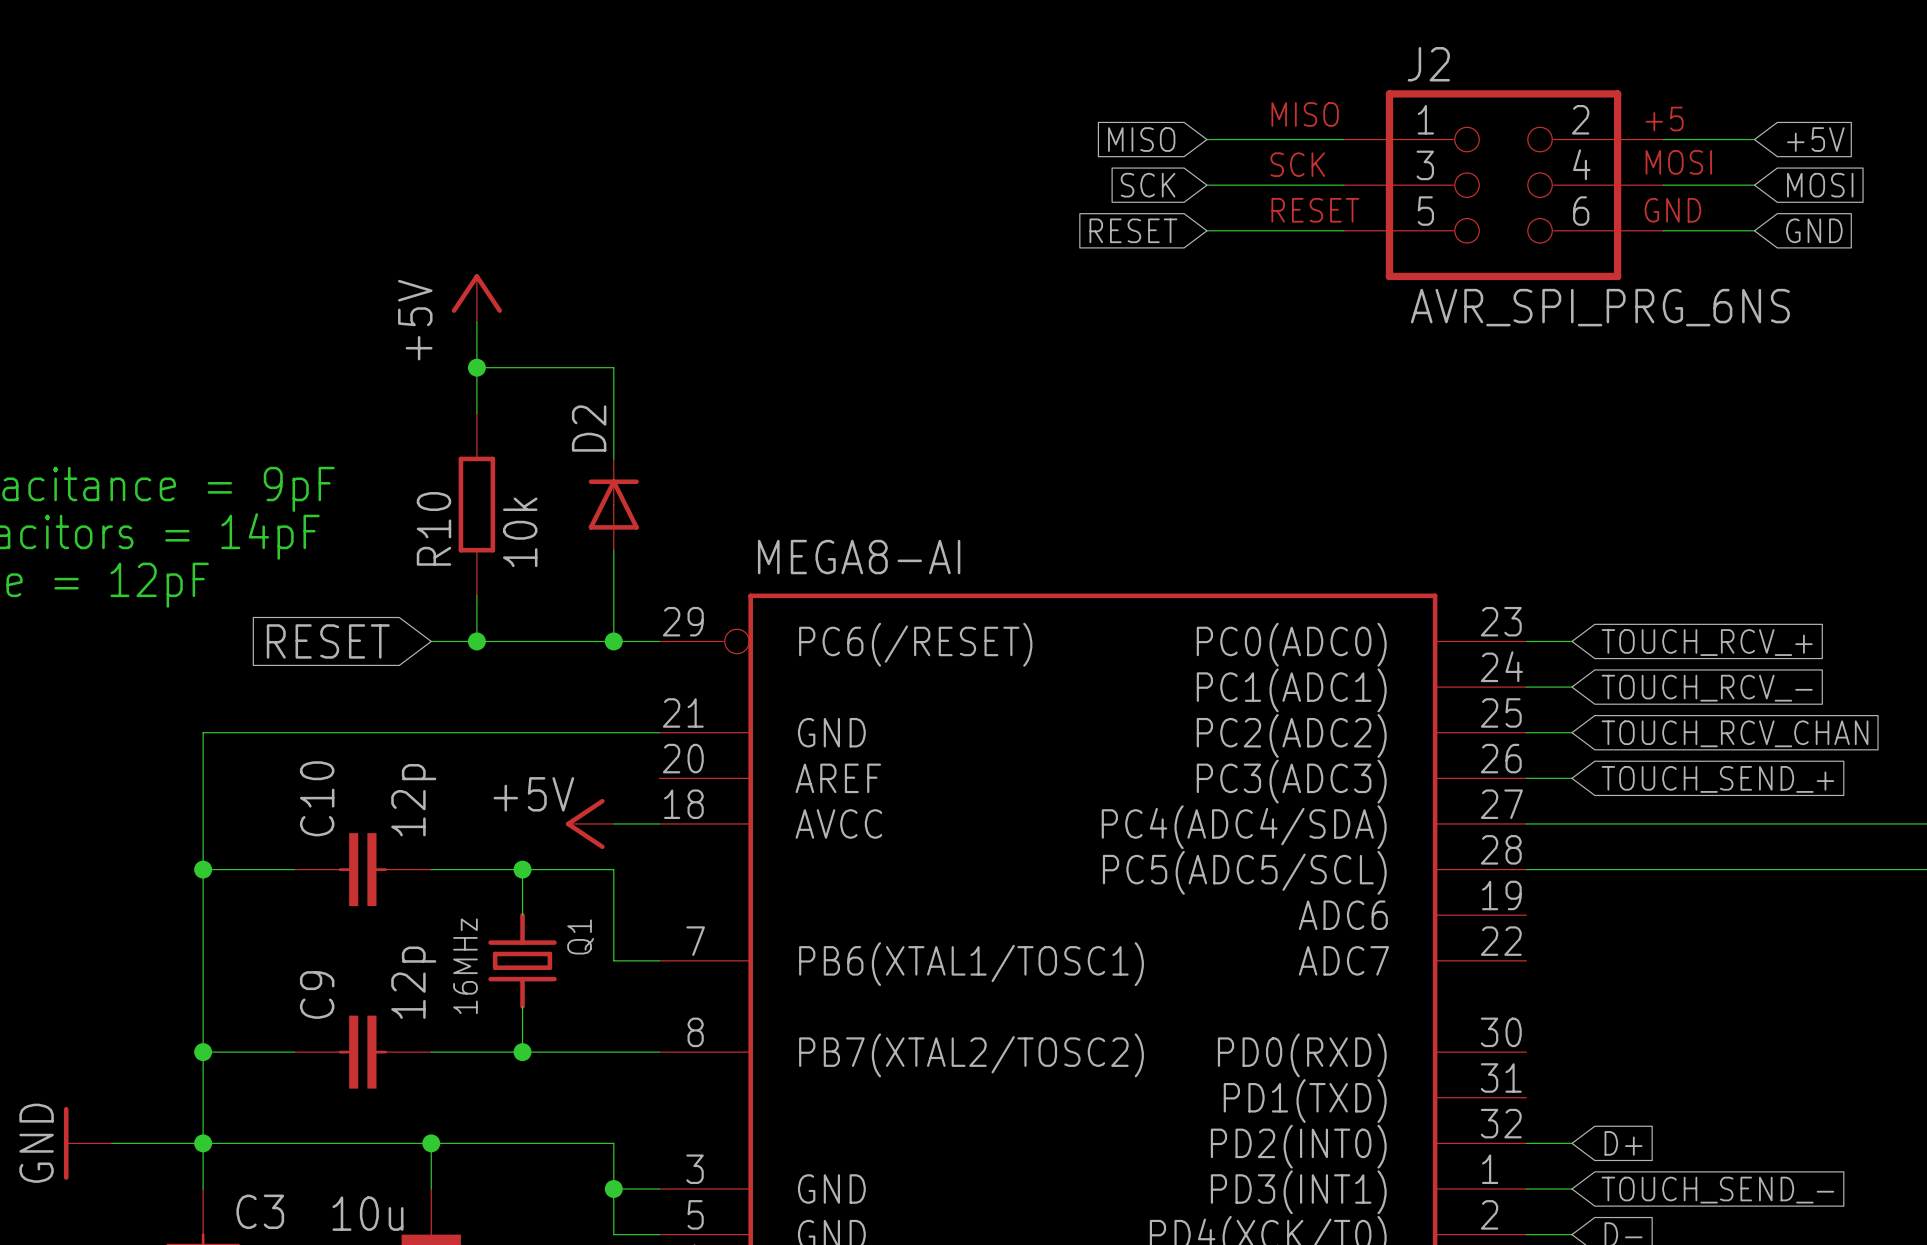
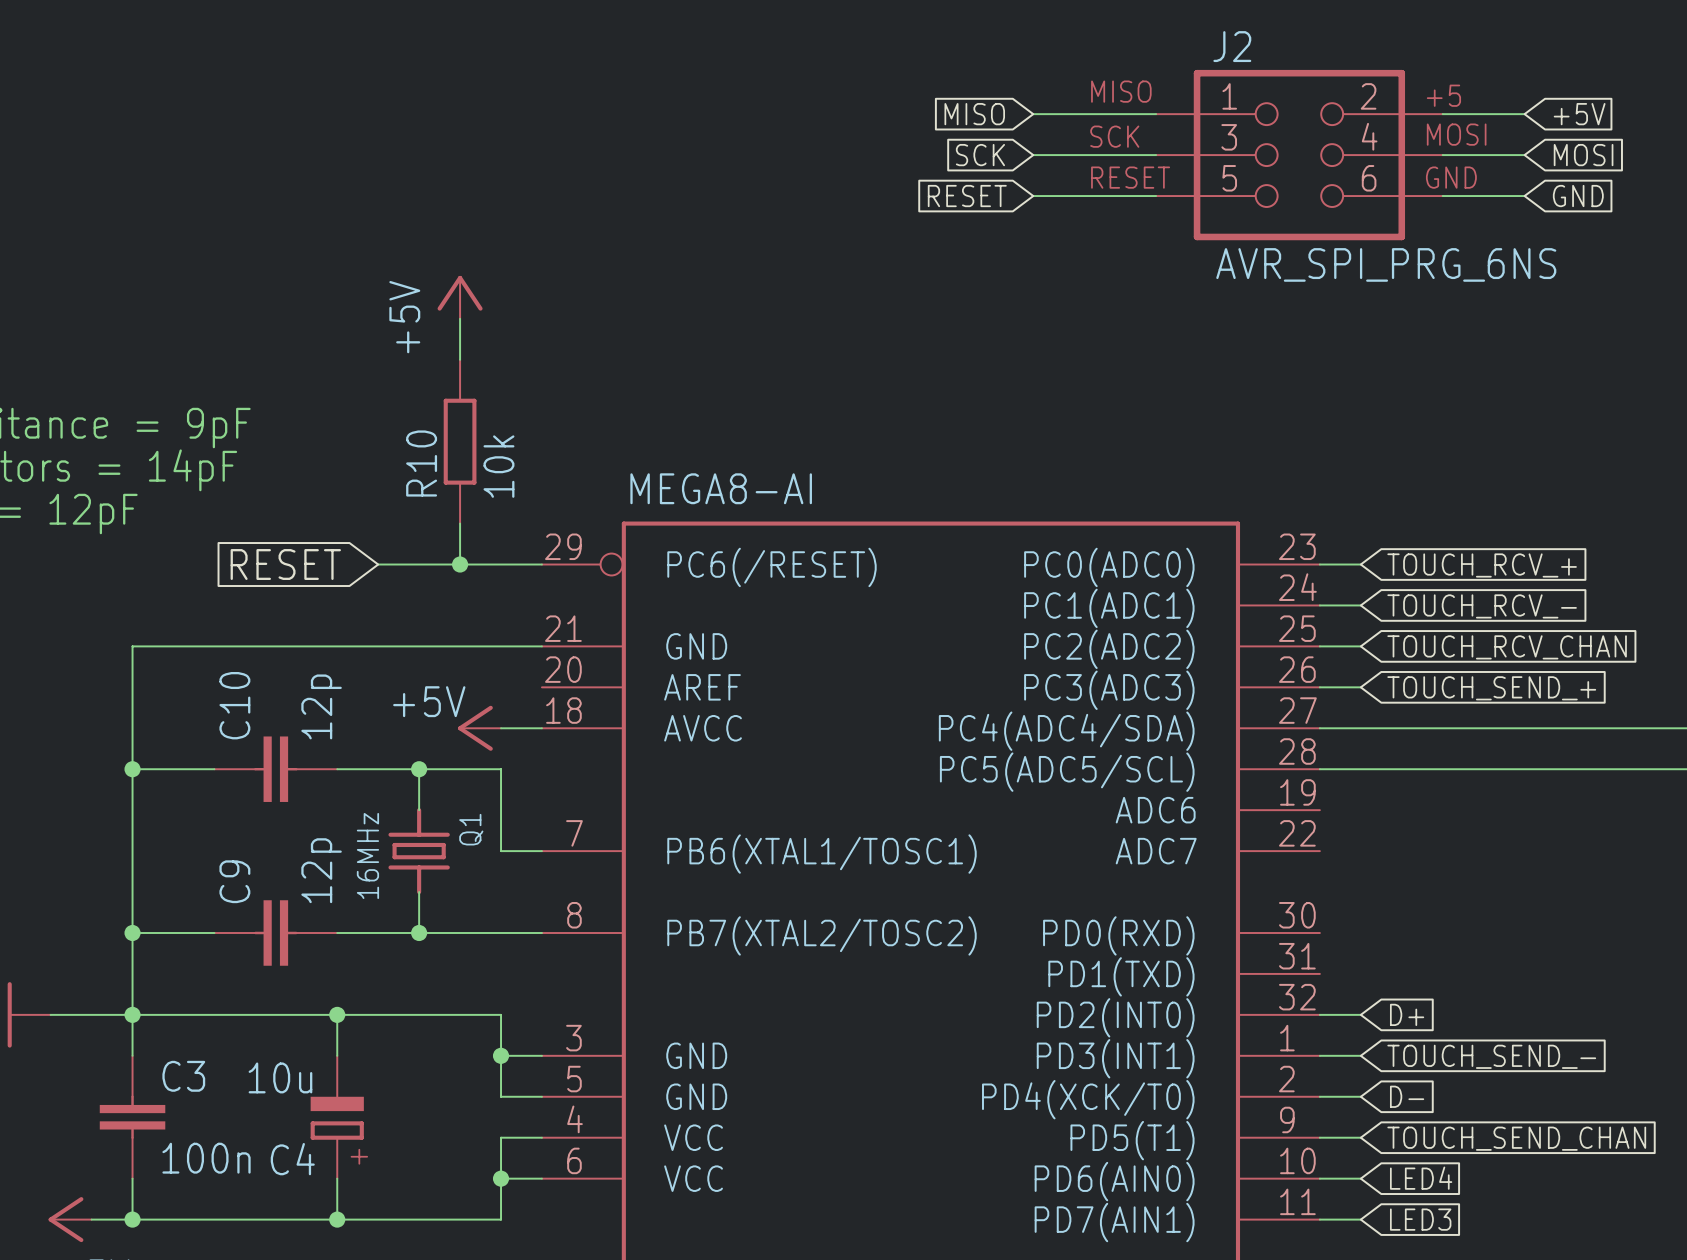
power symbol position: +5V (476, 298) -> +5V (460, 297)
wire: (476, 322) (476, 413) -> none
wire: (476, 367) (613, 367) (613, 458) -> none
junction: (476, 367) -> none
wire: none -> (460, 318) (460, 359)
R10 position: (476, 504) -> (460, 441)
D2: (613, 504) -> none
wire: (613, 550) (613, 641) -> none
wire: (476, 595) (476, 641) (431, 641) -> none
wire: none -> (460, 523) (460, 564)
global label position: RESET (328, 641) -> RESET (285, 564)
junction: (476, 641) -> none
junction: none -> (460, 564)
junction: (613, 641) -> none

